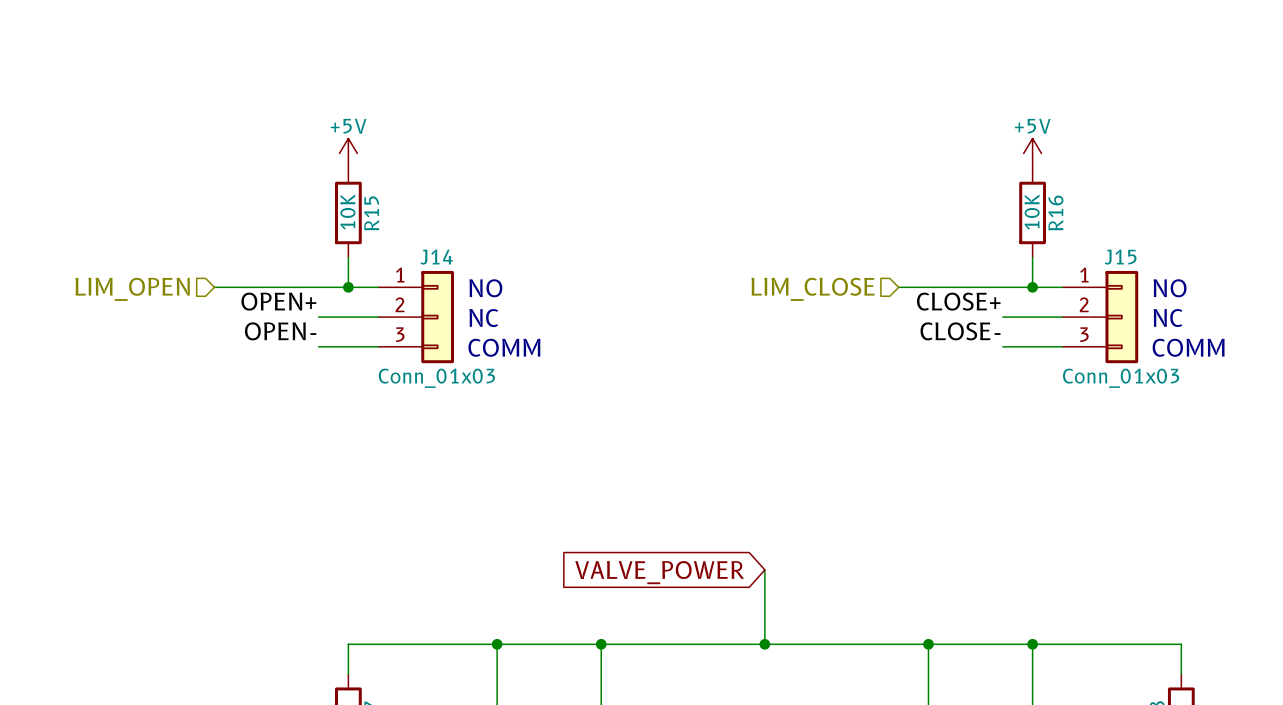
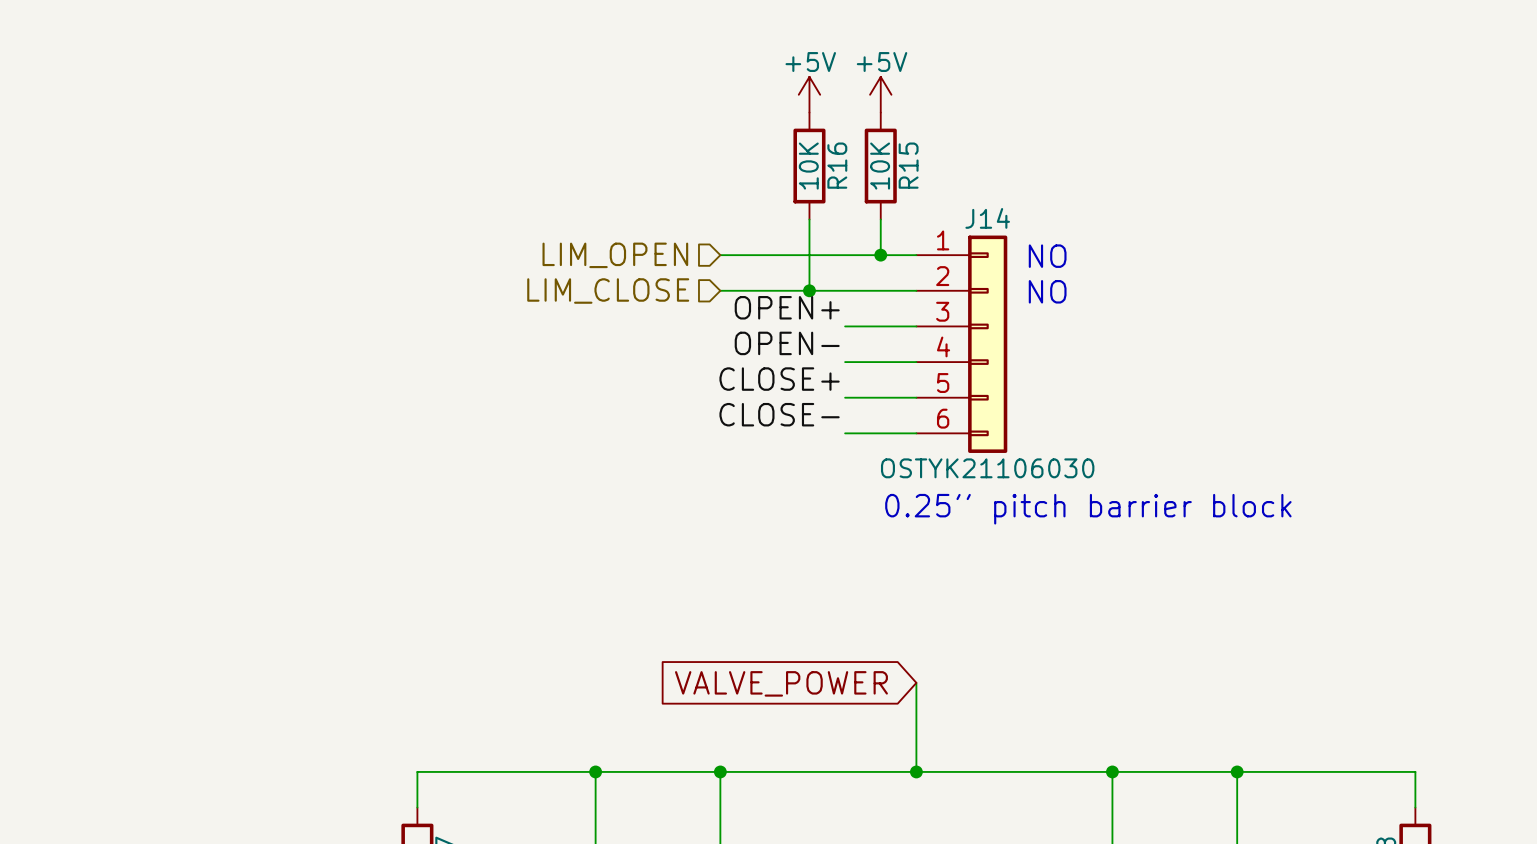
power symbol: none -> +5V (809, 94)
power symbol: none -> +5V (880, 94)
power symbol: +5V (348, 153) -> none
power symbol: +5V (1032, 153) -> none
wire: none -> (809, 219) (809, 290)
wire: none -> (880, 219) (880, 255)
R15 position: (348, 212) -> (880, 166)
wire: none -> (720, 255) (916, 255)
junction: none -> (880, 255)
R16 position: (1032, 212) -> (809, 166)
text: none -> NO (1047, 256)
hierarchical label: none -> LIM_OPEN (615, 255)
wire: none -> (720, 290) (916, 290)
junction: none -> (809, 290)
text: none -> NO (1047, 291)
hierarchical label: none -> LIM_CLOSE (608, 291)
label: none -> OPEN+ (787, 307)
wire: (348, 257) (348, 287) -> none
J14 name position: J14 (436, 257) -> J14 (987, 218)
wire: (1032, 257) (1032, 287) -> none
J14 symbol: [378, 270, 454, 364] -> [916, 235, 1008, 453]
wire: none -> (845, 326) (916, 326)
label: none -> OPEN- (787, 343)
wire: (214, 287) (378, 287) -> none
junction: (348, 287) -> none
wire: (898, 287) (1062, 287) -> none
junction: (1032, 287) -> none
text: NO (485, 288) -> none
text: NO (1170, 288) -> none
hierarchical label: LIM_OPEN (132, 289) -> none
hierarchical label: LIM_CLOSE (813, 289) -> none
label: OPEN+ (278, 301) -> none
label: CLOSE+ (958, 301) -> none
wire: none -> (845, 362) (916, 362)
label: none -> CLOSE+ (779, 379)
wire: (318, 317) (378, 317) -> none
wire: (1002, 317) (1062, 317) -> none
J15: Conn_01x03 (1100, 317) -> none
text: NC (483, 318) -> none
text: NC (1167, 318) -> none
label: OPEN- (280, 331) -> none
wire: none -> (845, 397) (916, 397)
label: CLOSE- (960, 331) -> none
wire: (318, 346) (378, 346) -> none
label: none -> CLOSE- (779, 414)
wire: (1002, 346) (1062, 346) -> none
text: COMM (504, 347) -> none
text: COMM (1188, 347) -> none
wire: none -> (845, 433) (916, 433)
J14 value: Conn_01x03 (436, 378) -> OSTYK21106030 (987, 468)
text: none -> 0.25'' pitch barrier block (1088, 509)

